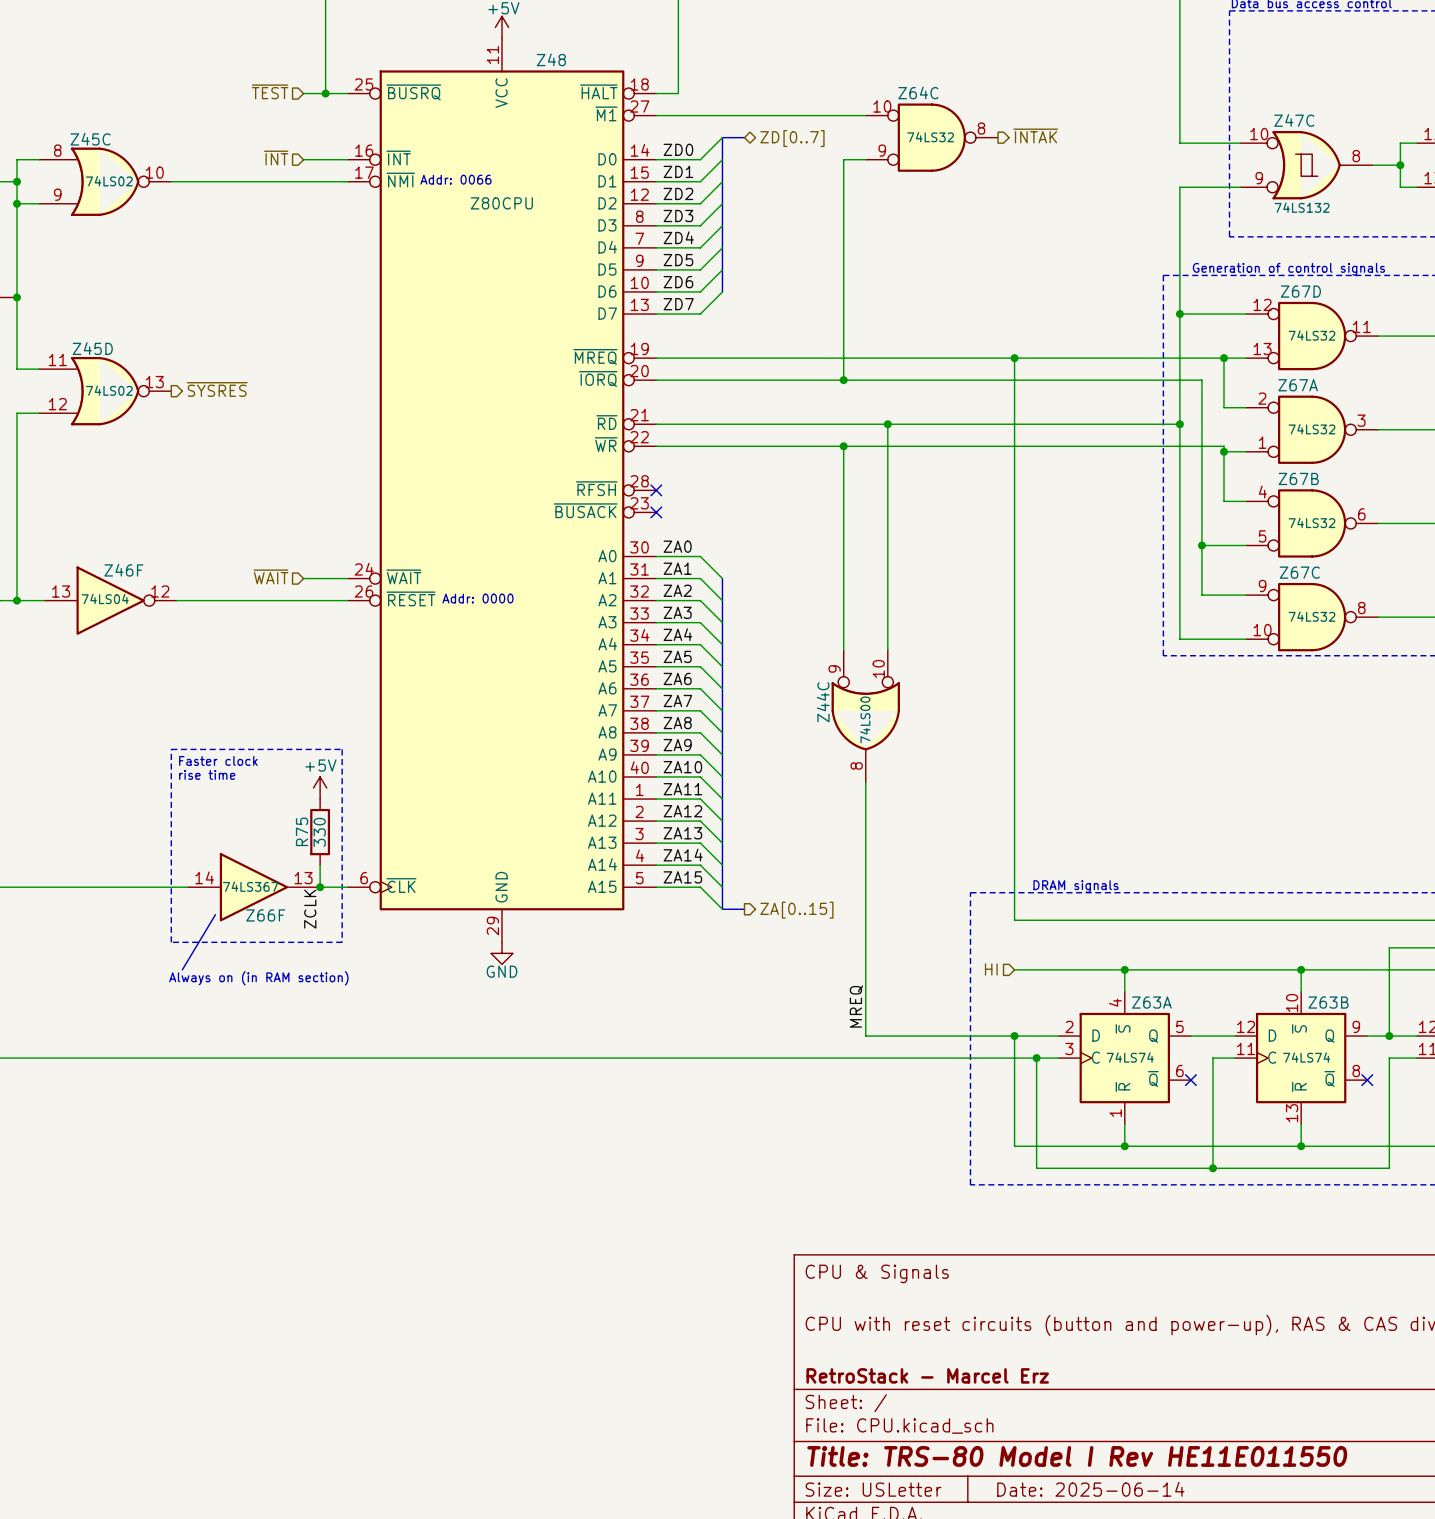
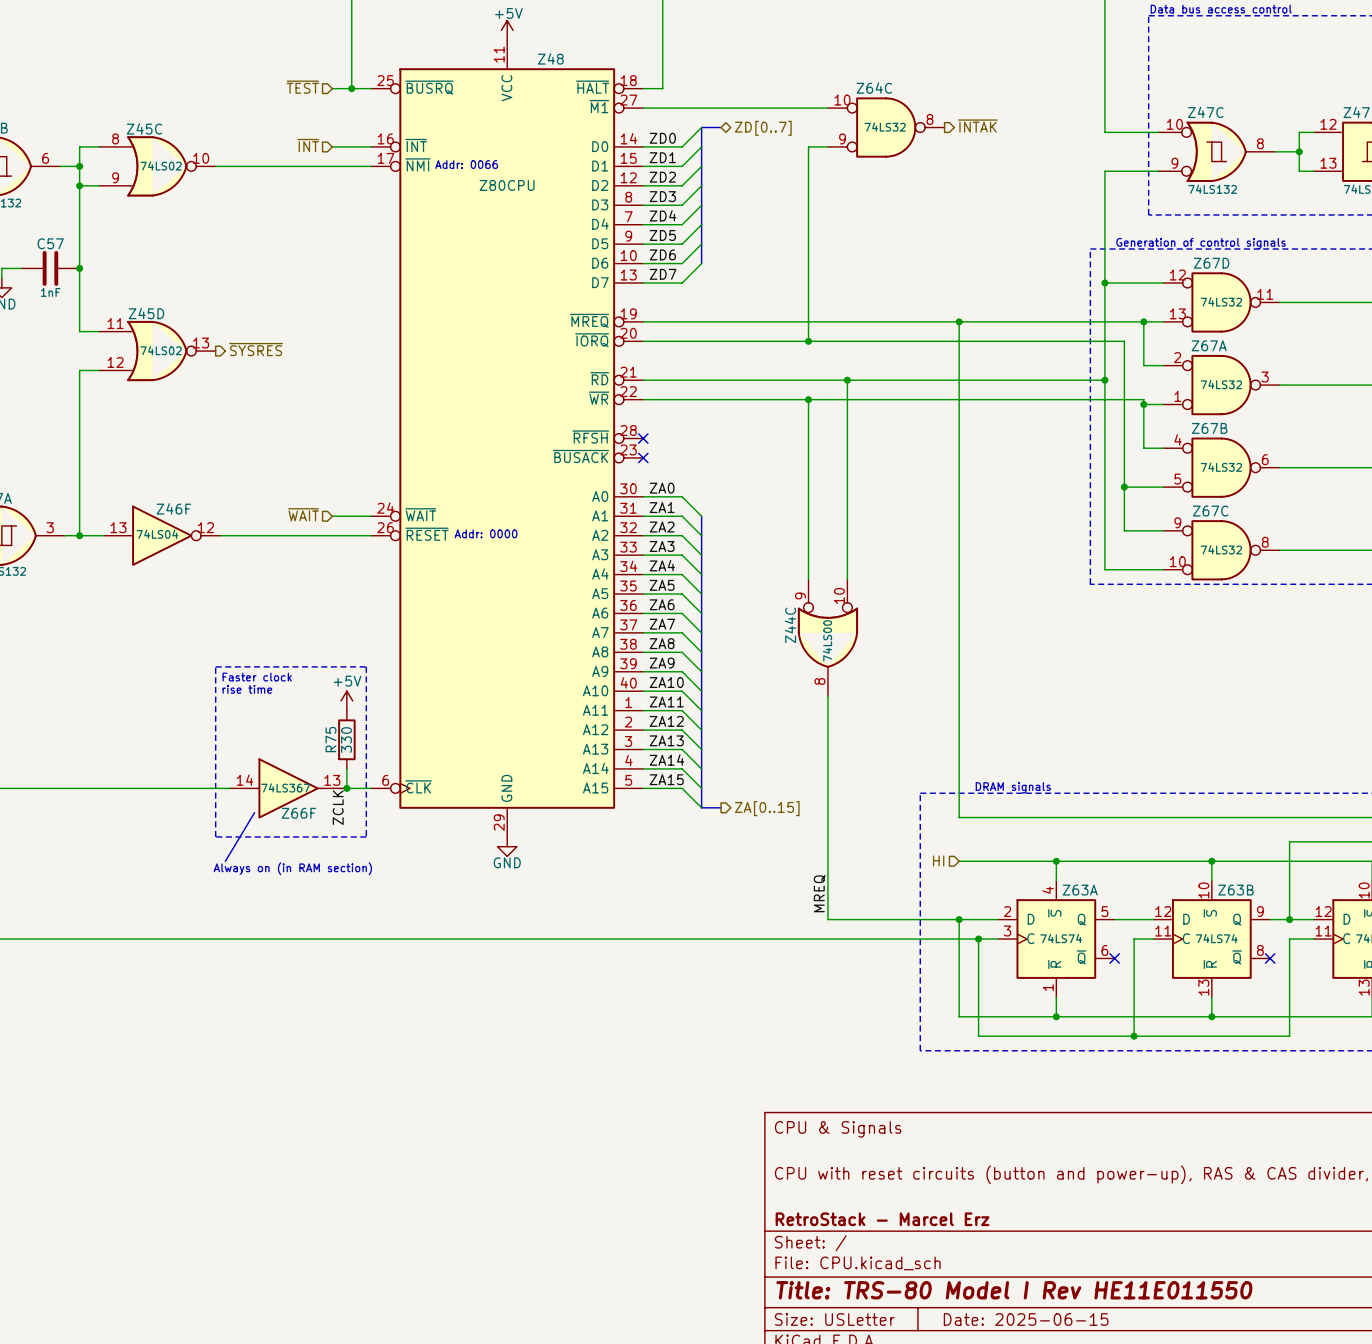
title block: Date: 2025-06-14 (1090, 1489) -> Date: 2025-06-15 (1026, 1319)

